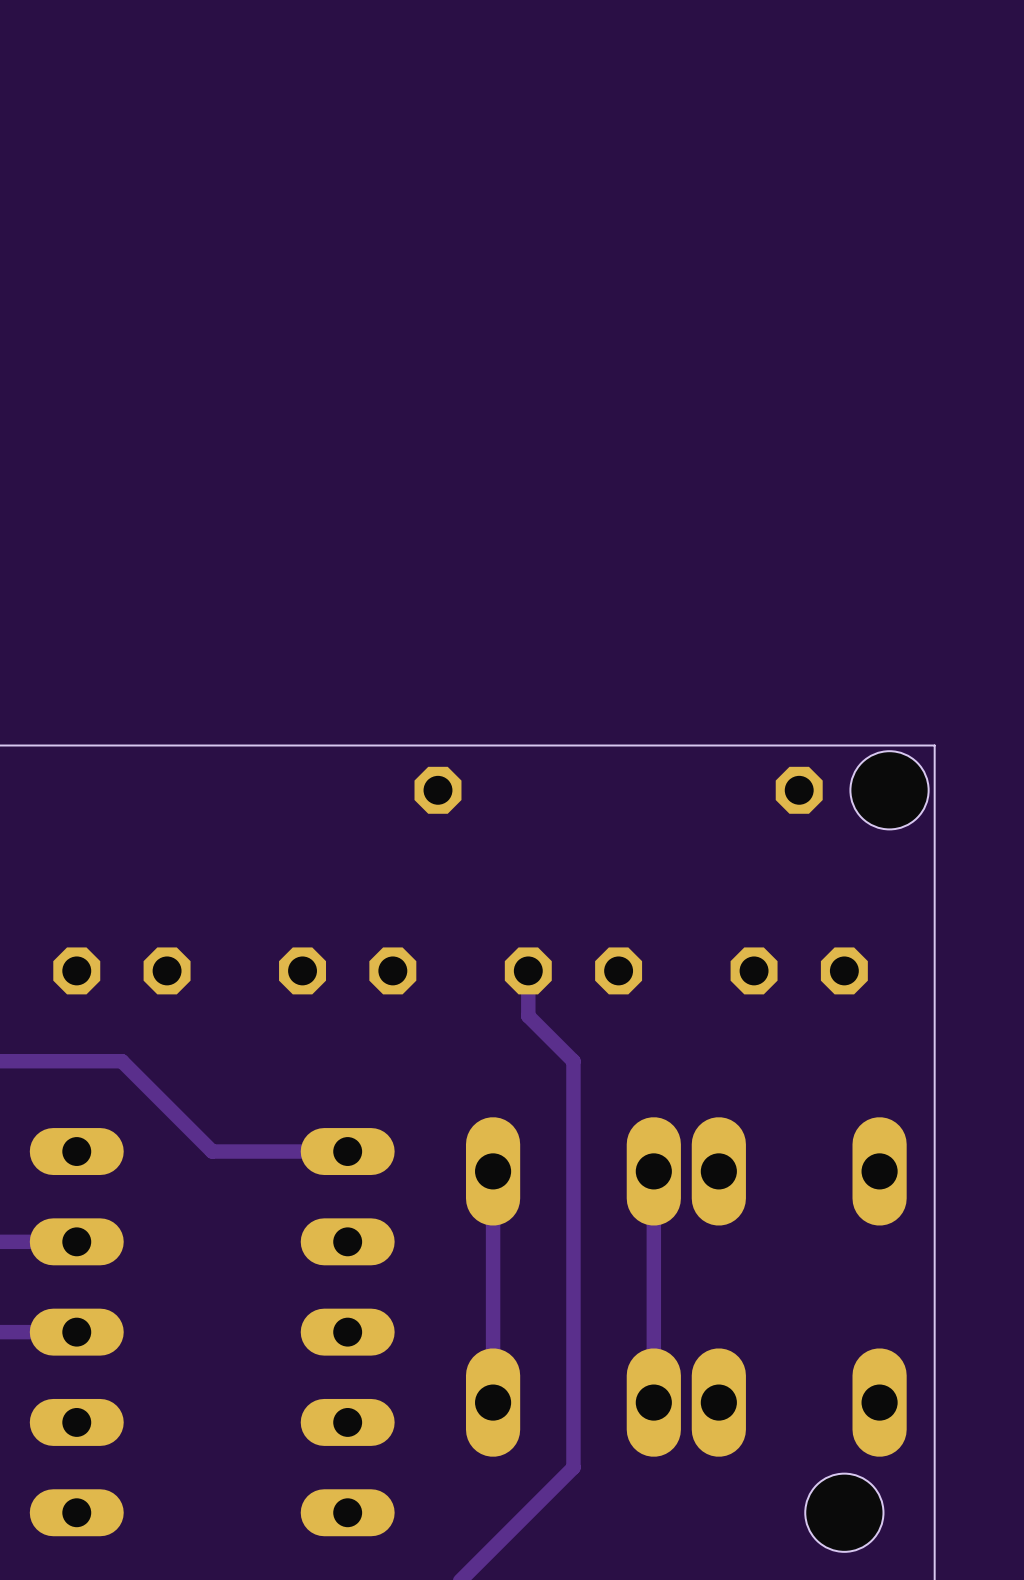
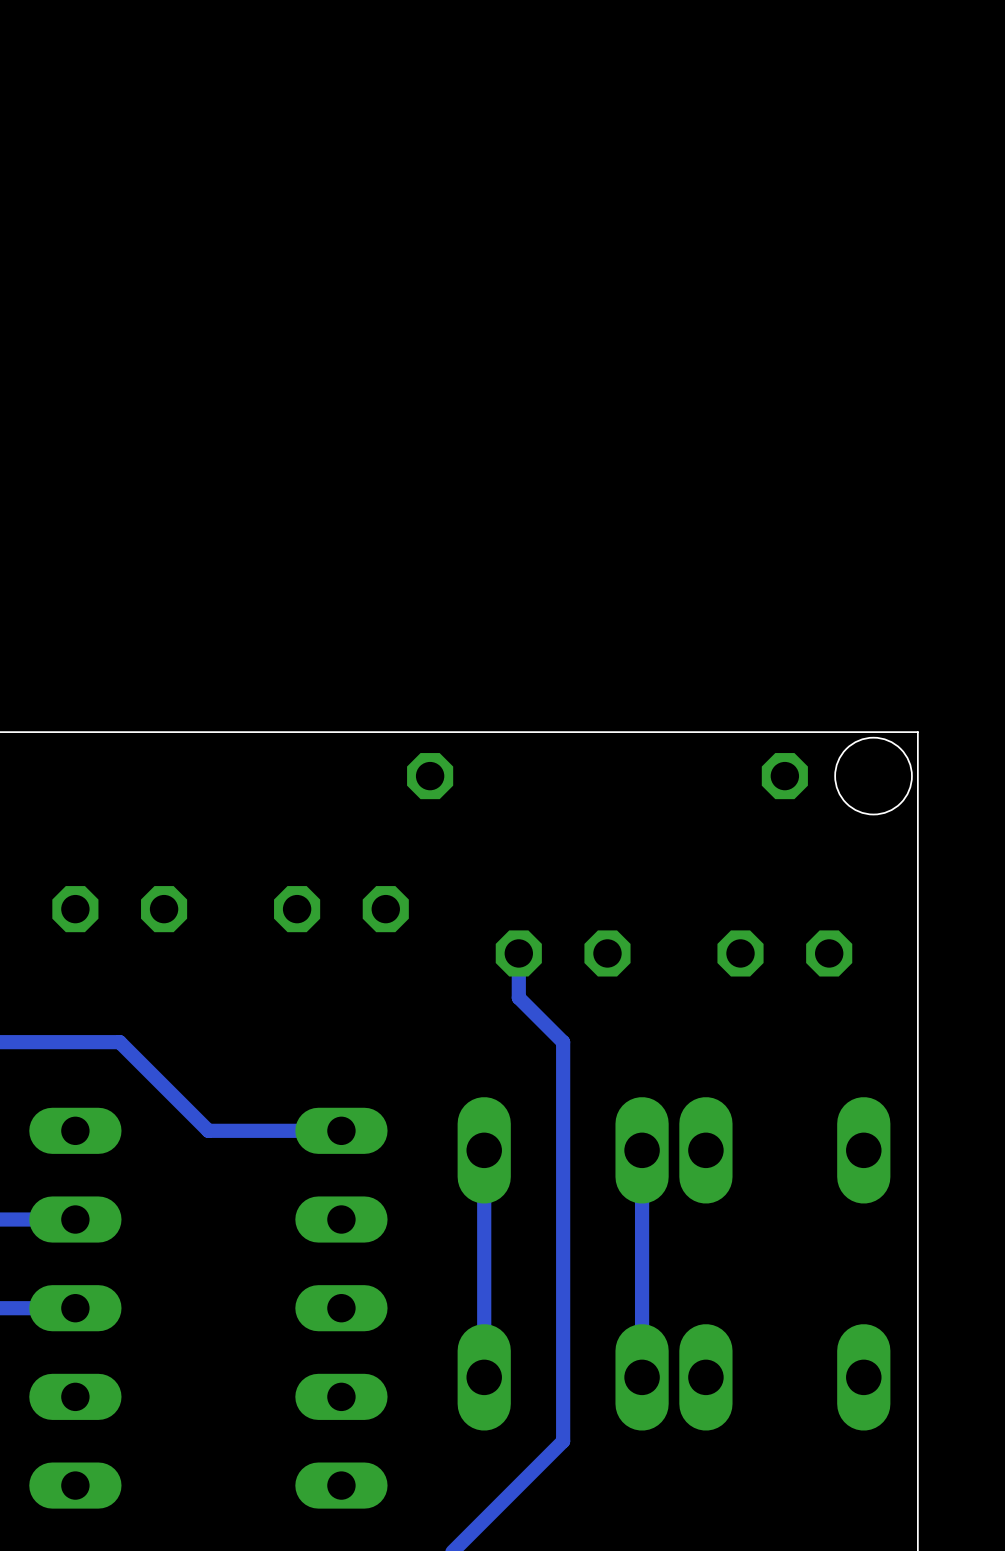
part position: (121, 970) -> (119, 909)
part position: (347, 970) -> (341, 909)
hole: (844, 1512) -> none

